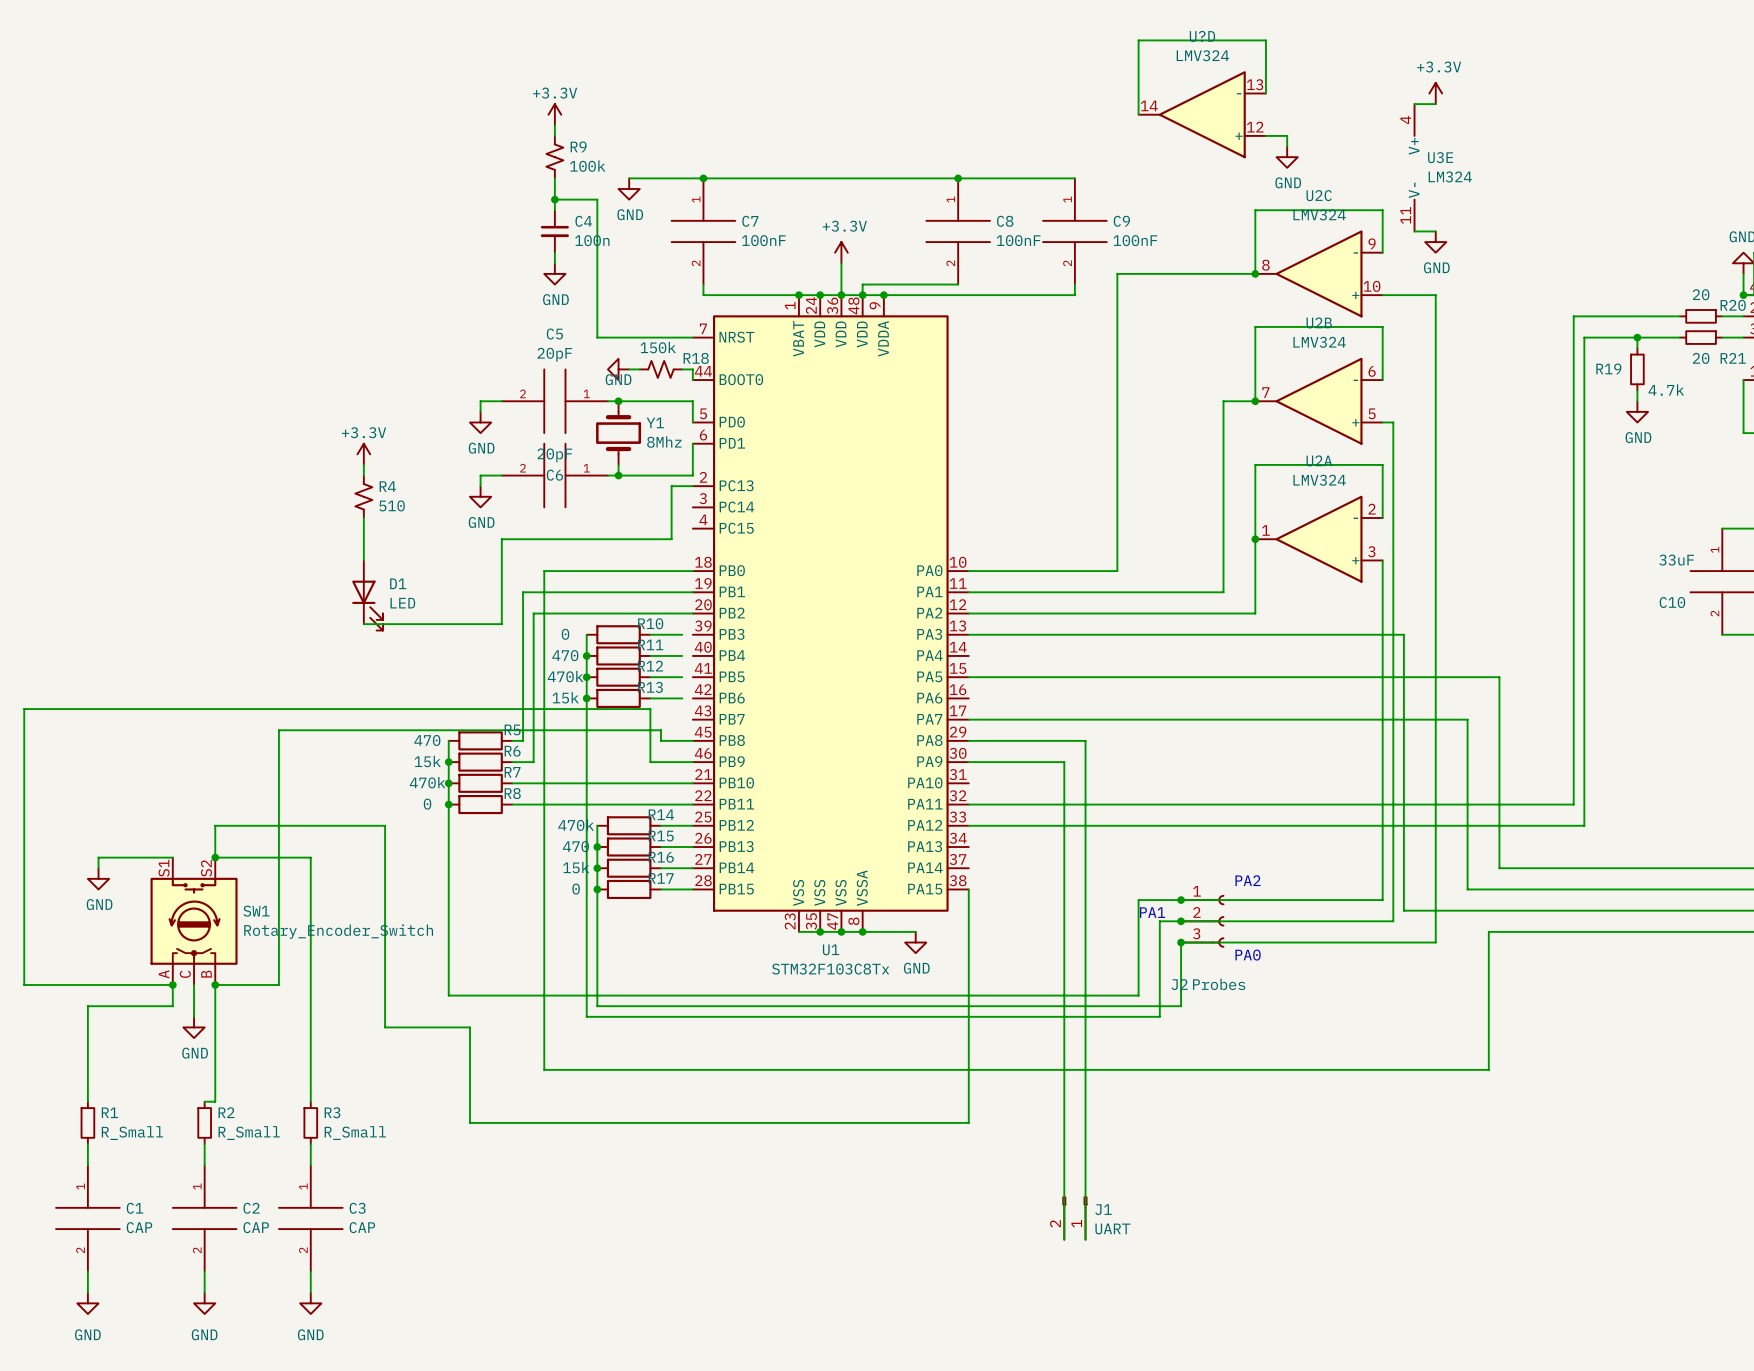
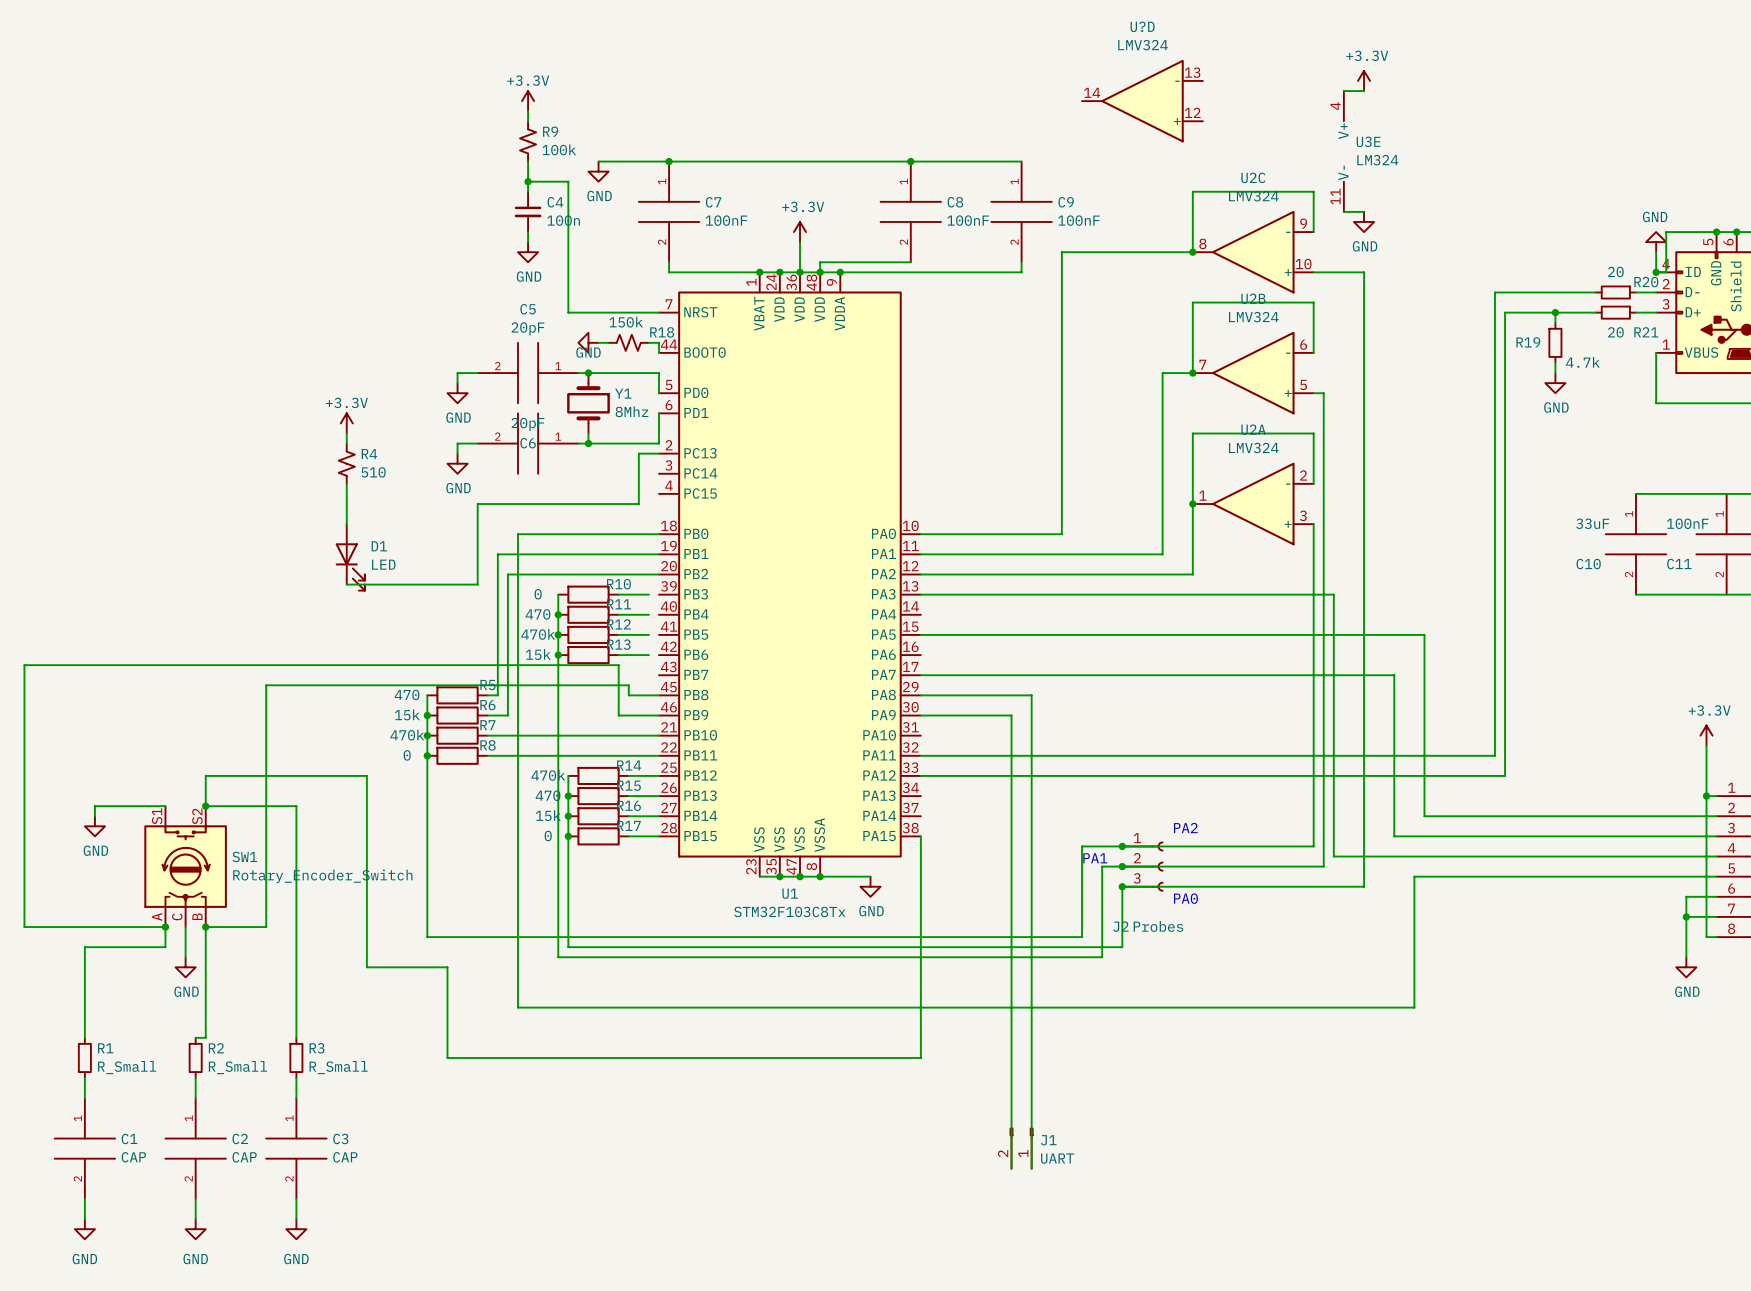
wire: (1265, 93) (1265, 40) (1138, 40) (1138, 114) -> none
wire: (1265, 135) (1287, 135) (1287, 146) -> none
power symbol: GND (1287, 157) -> none

